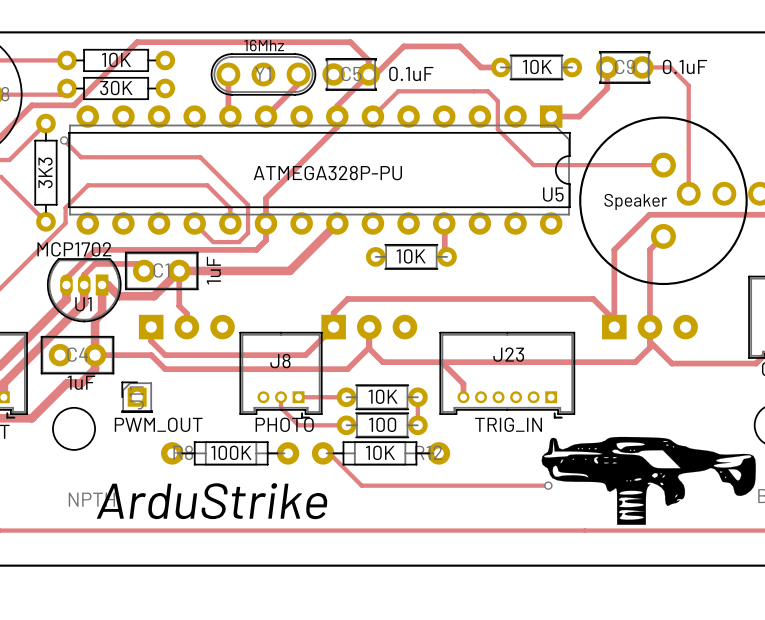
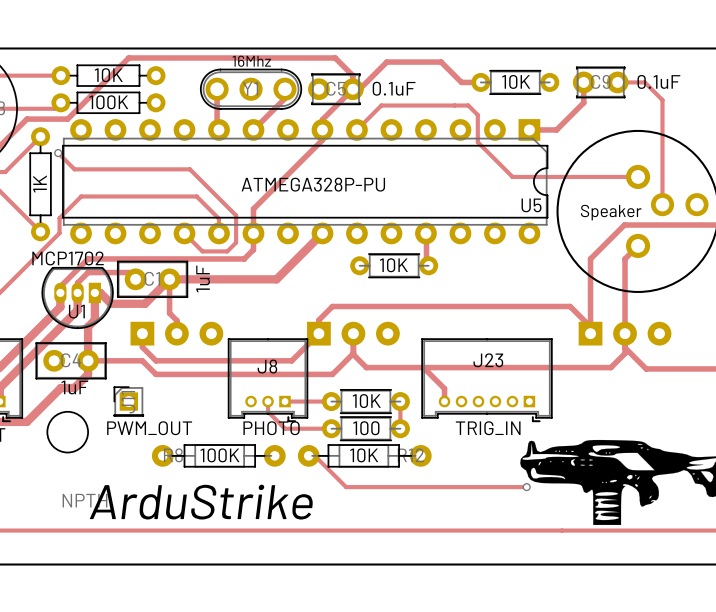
part value: 30K (116, 87) -> 100K (108, 102)
part value: 3K3 (45, 172) -> 1K (40, 183)

